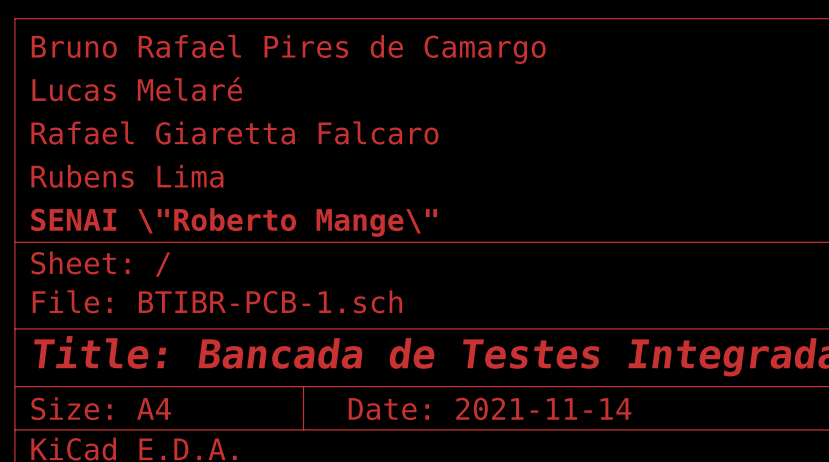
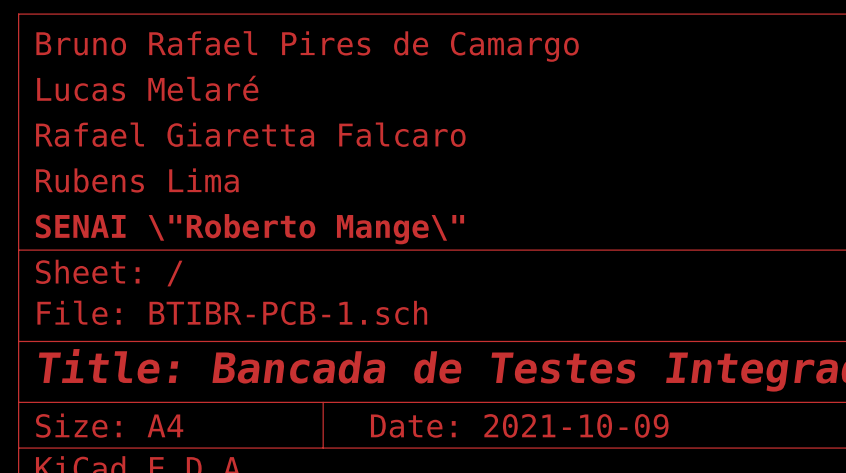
title block: Date: 2021-11-14 (490, 408) -> Date: 2021-10-09 (519, 425)

